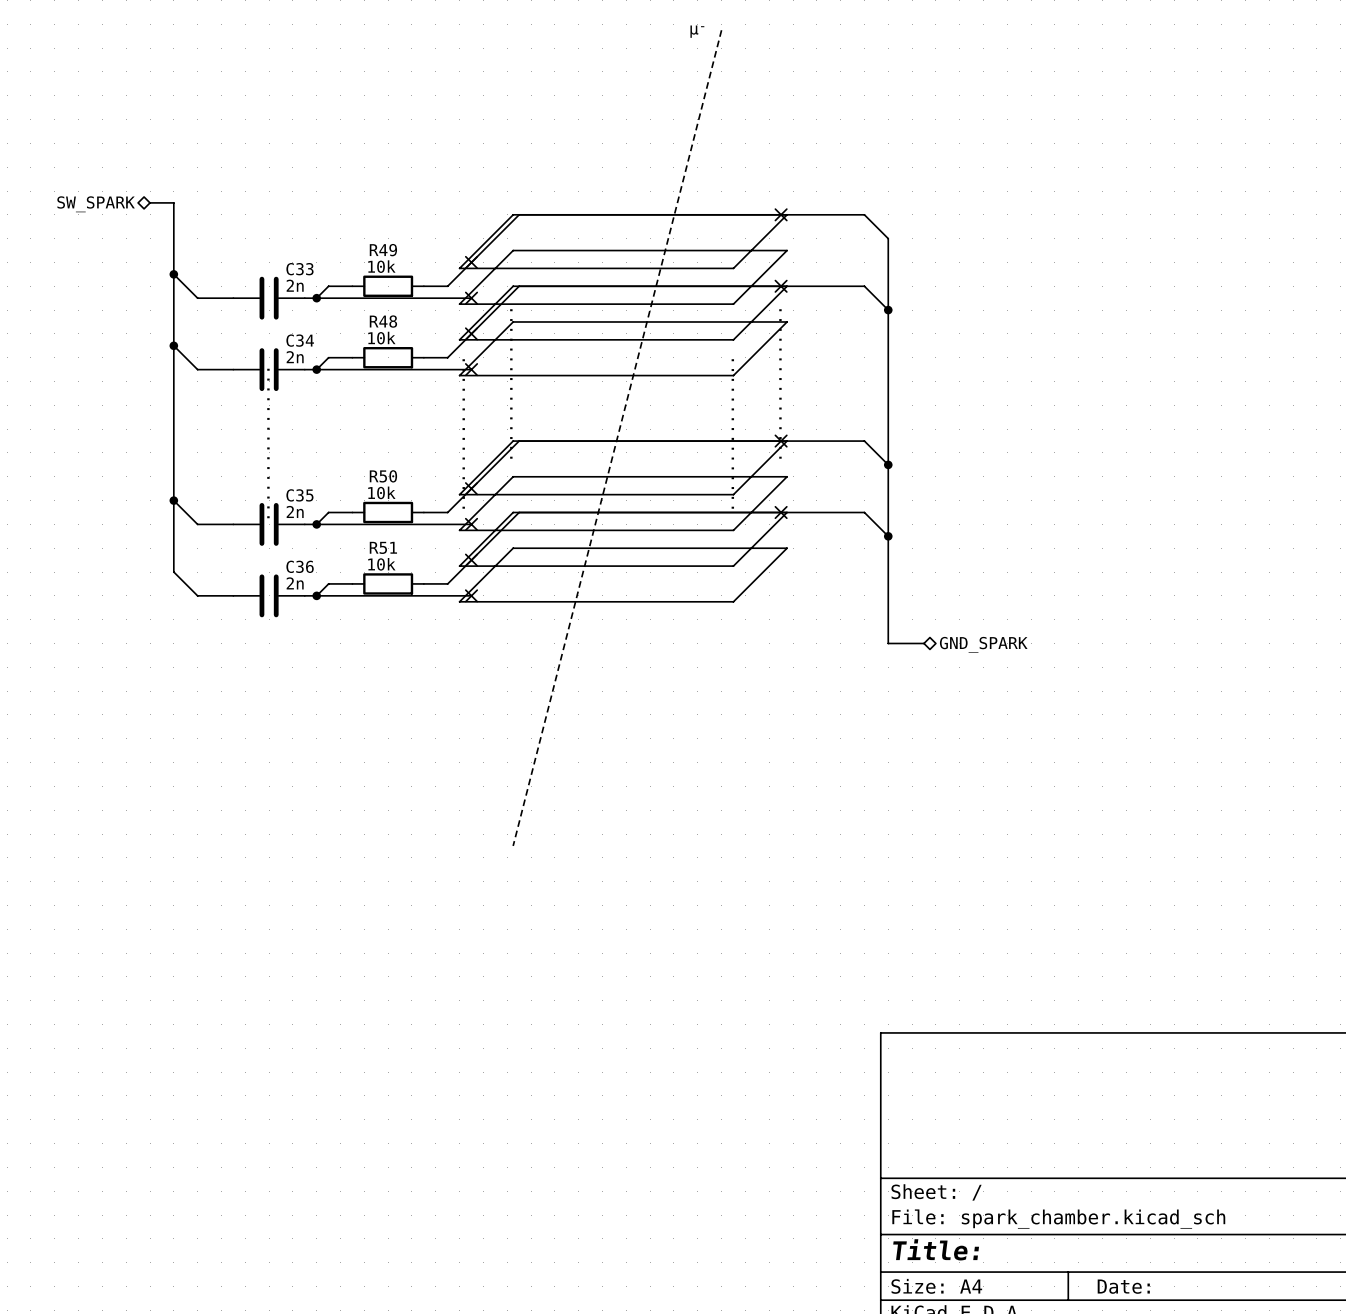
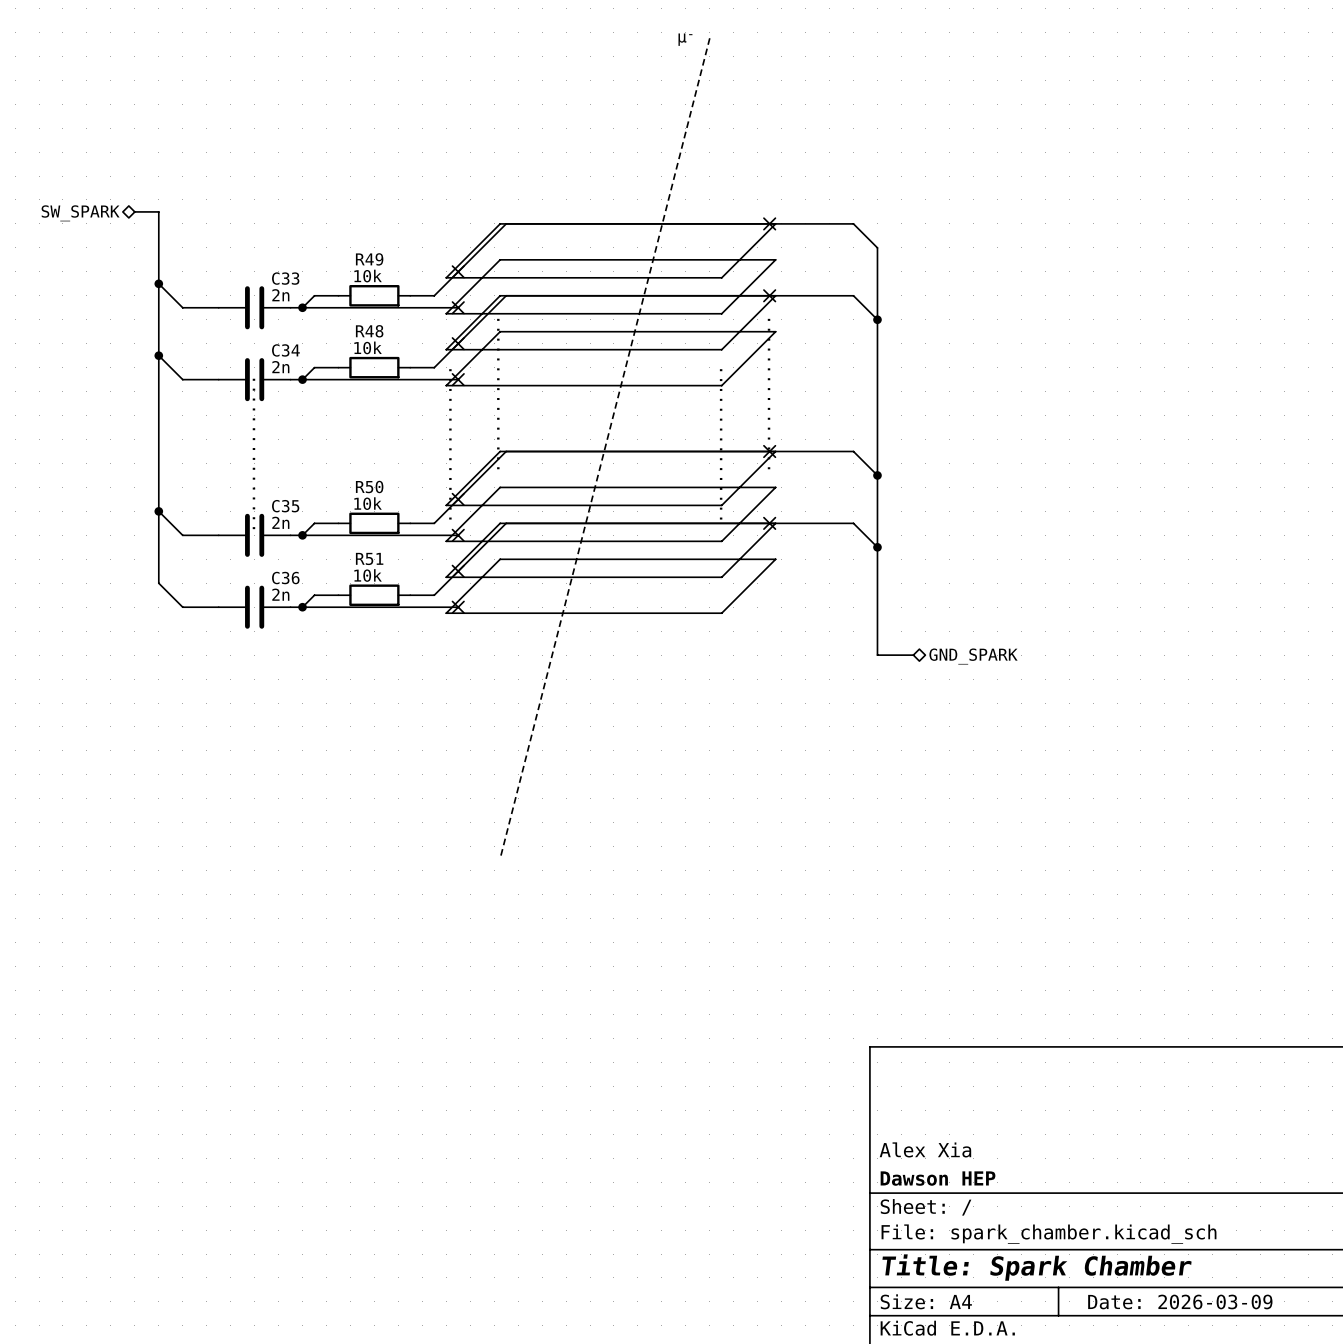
title block: none -> Alex Xia (925, 1149)
title block: none -> Dawson HEP (938, 1178)
title block: Title: (936, 1249) -> Title: Spark Chamber (1037, 1267)
title block: Date: (1123, 1286) -> Date: 2026-03-09 (1180, 1301)

